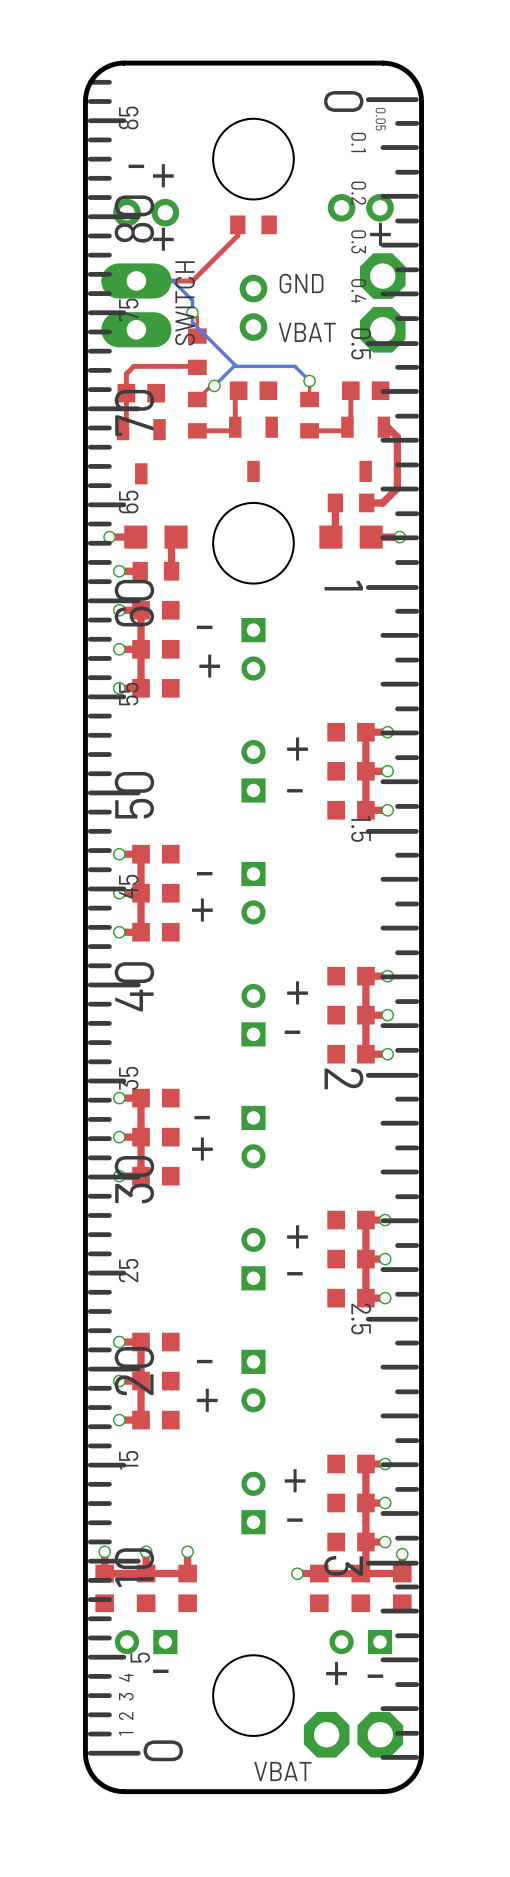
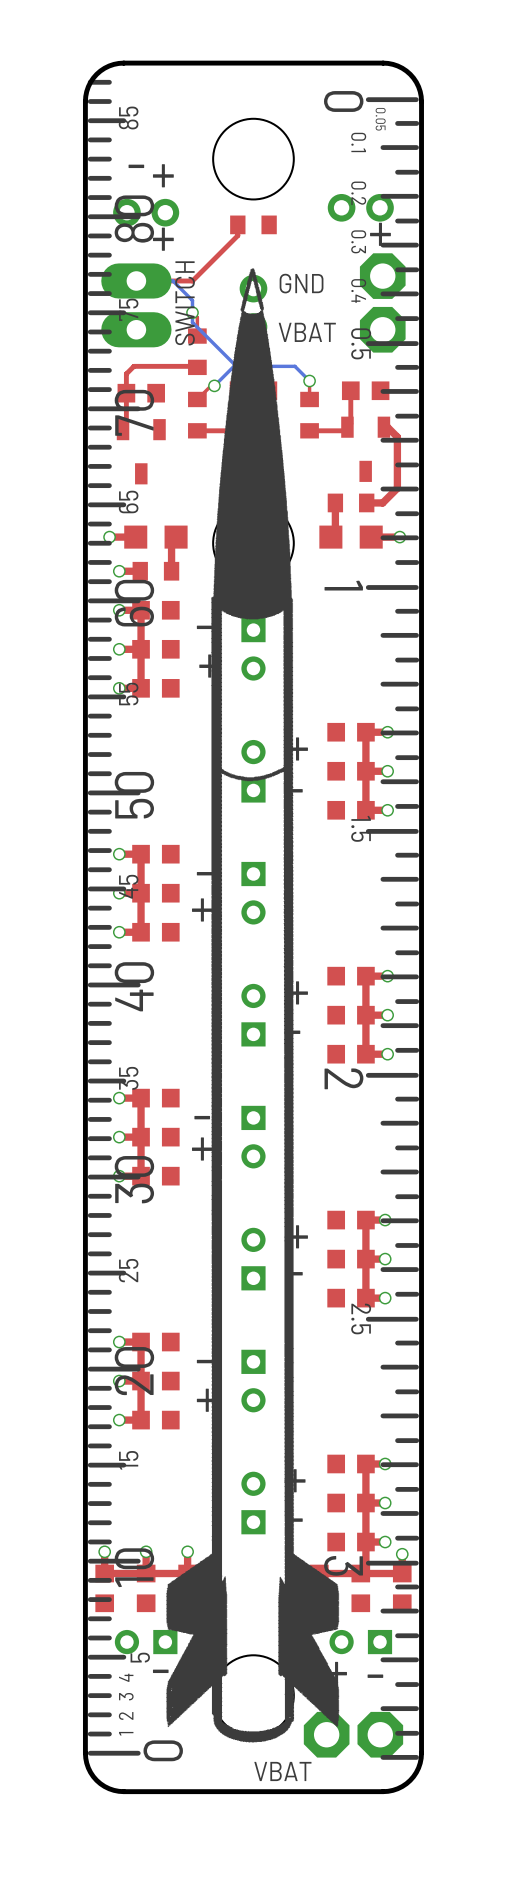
drawing: none -> [166, 268, 340, 1743]

